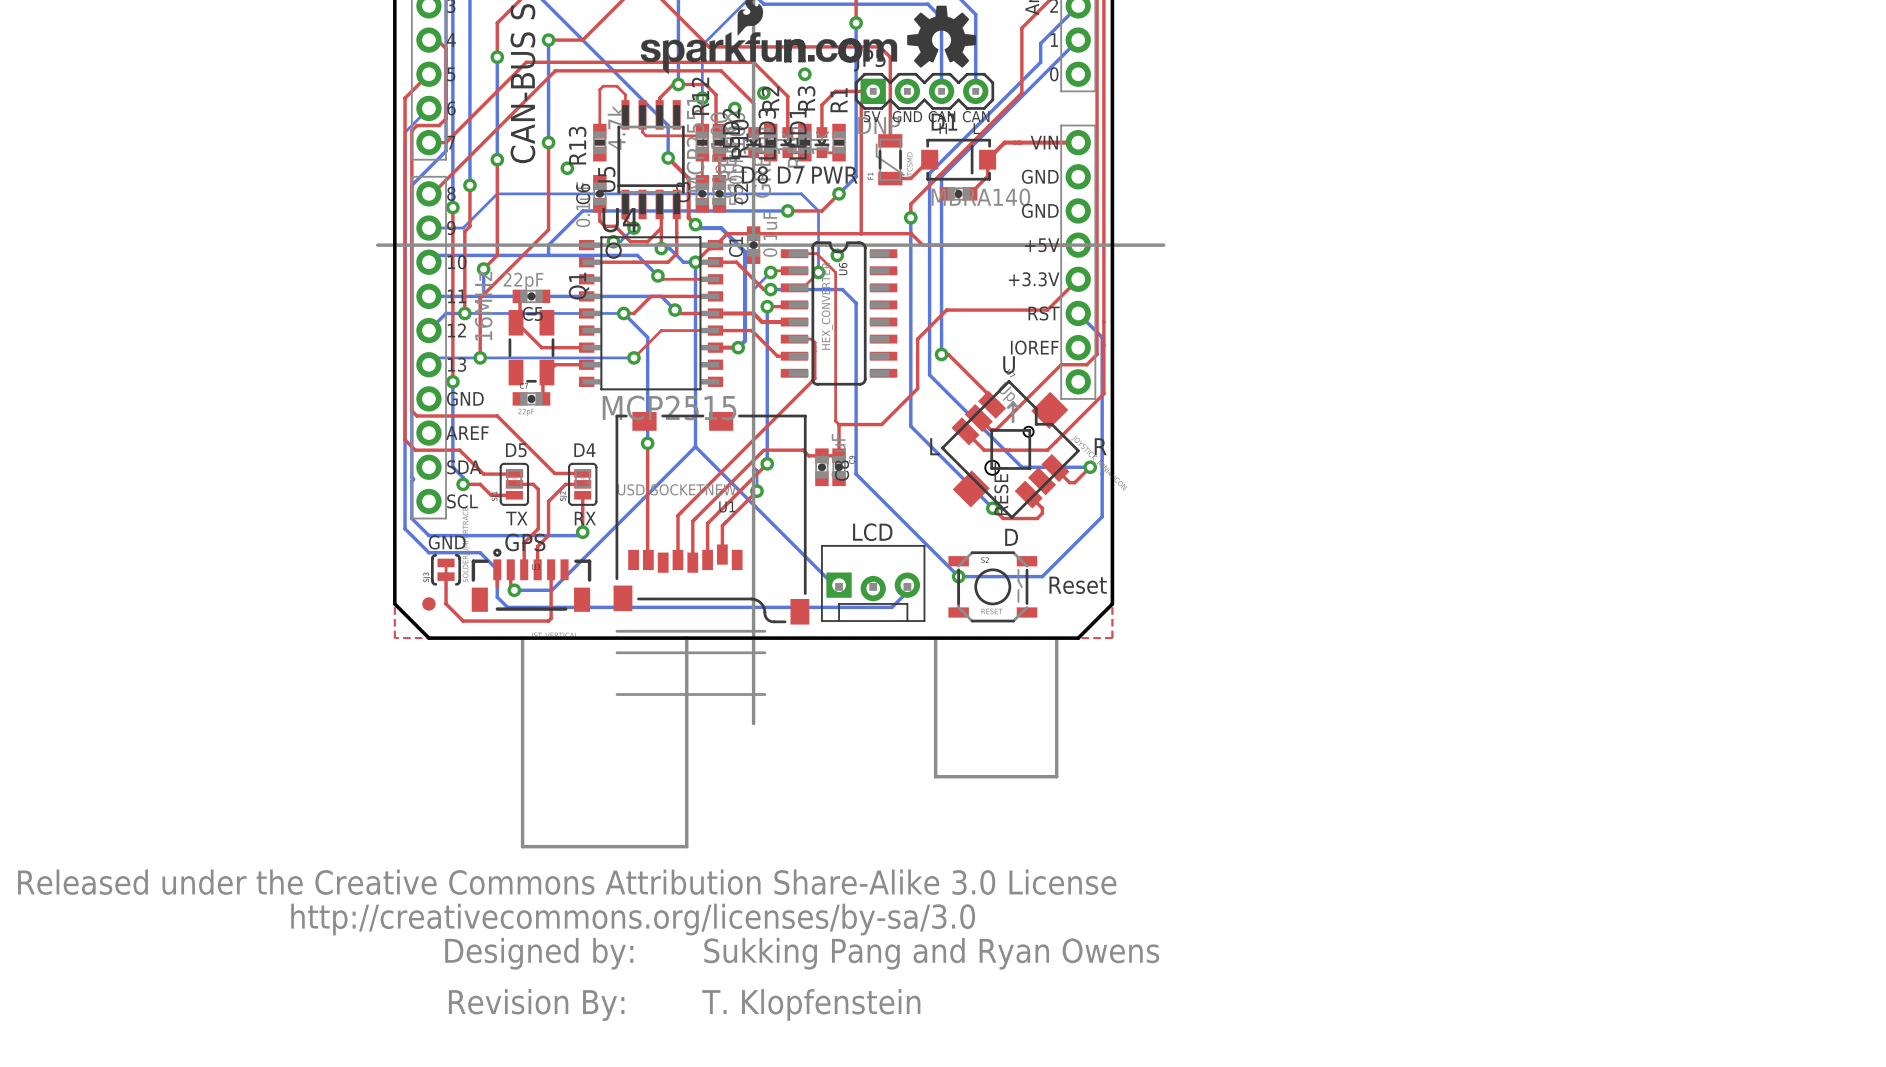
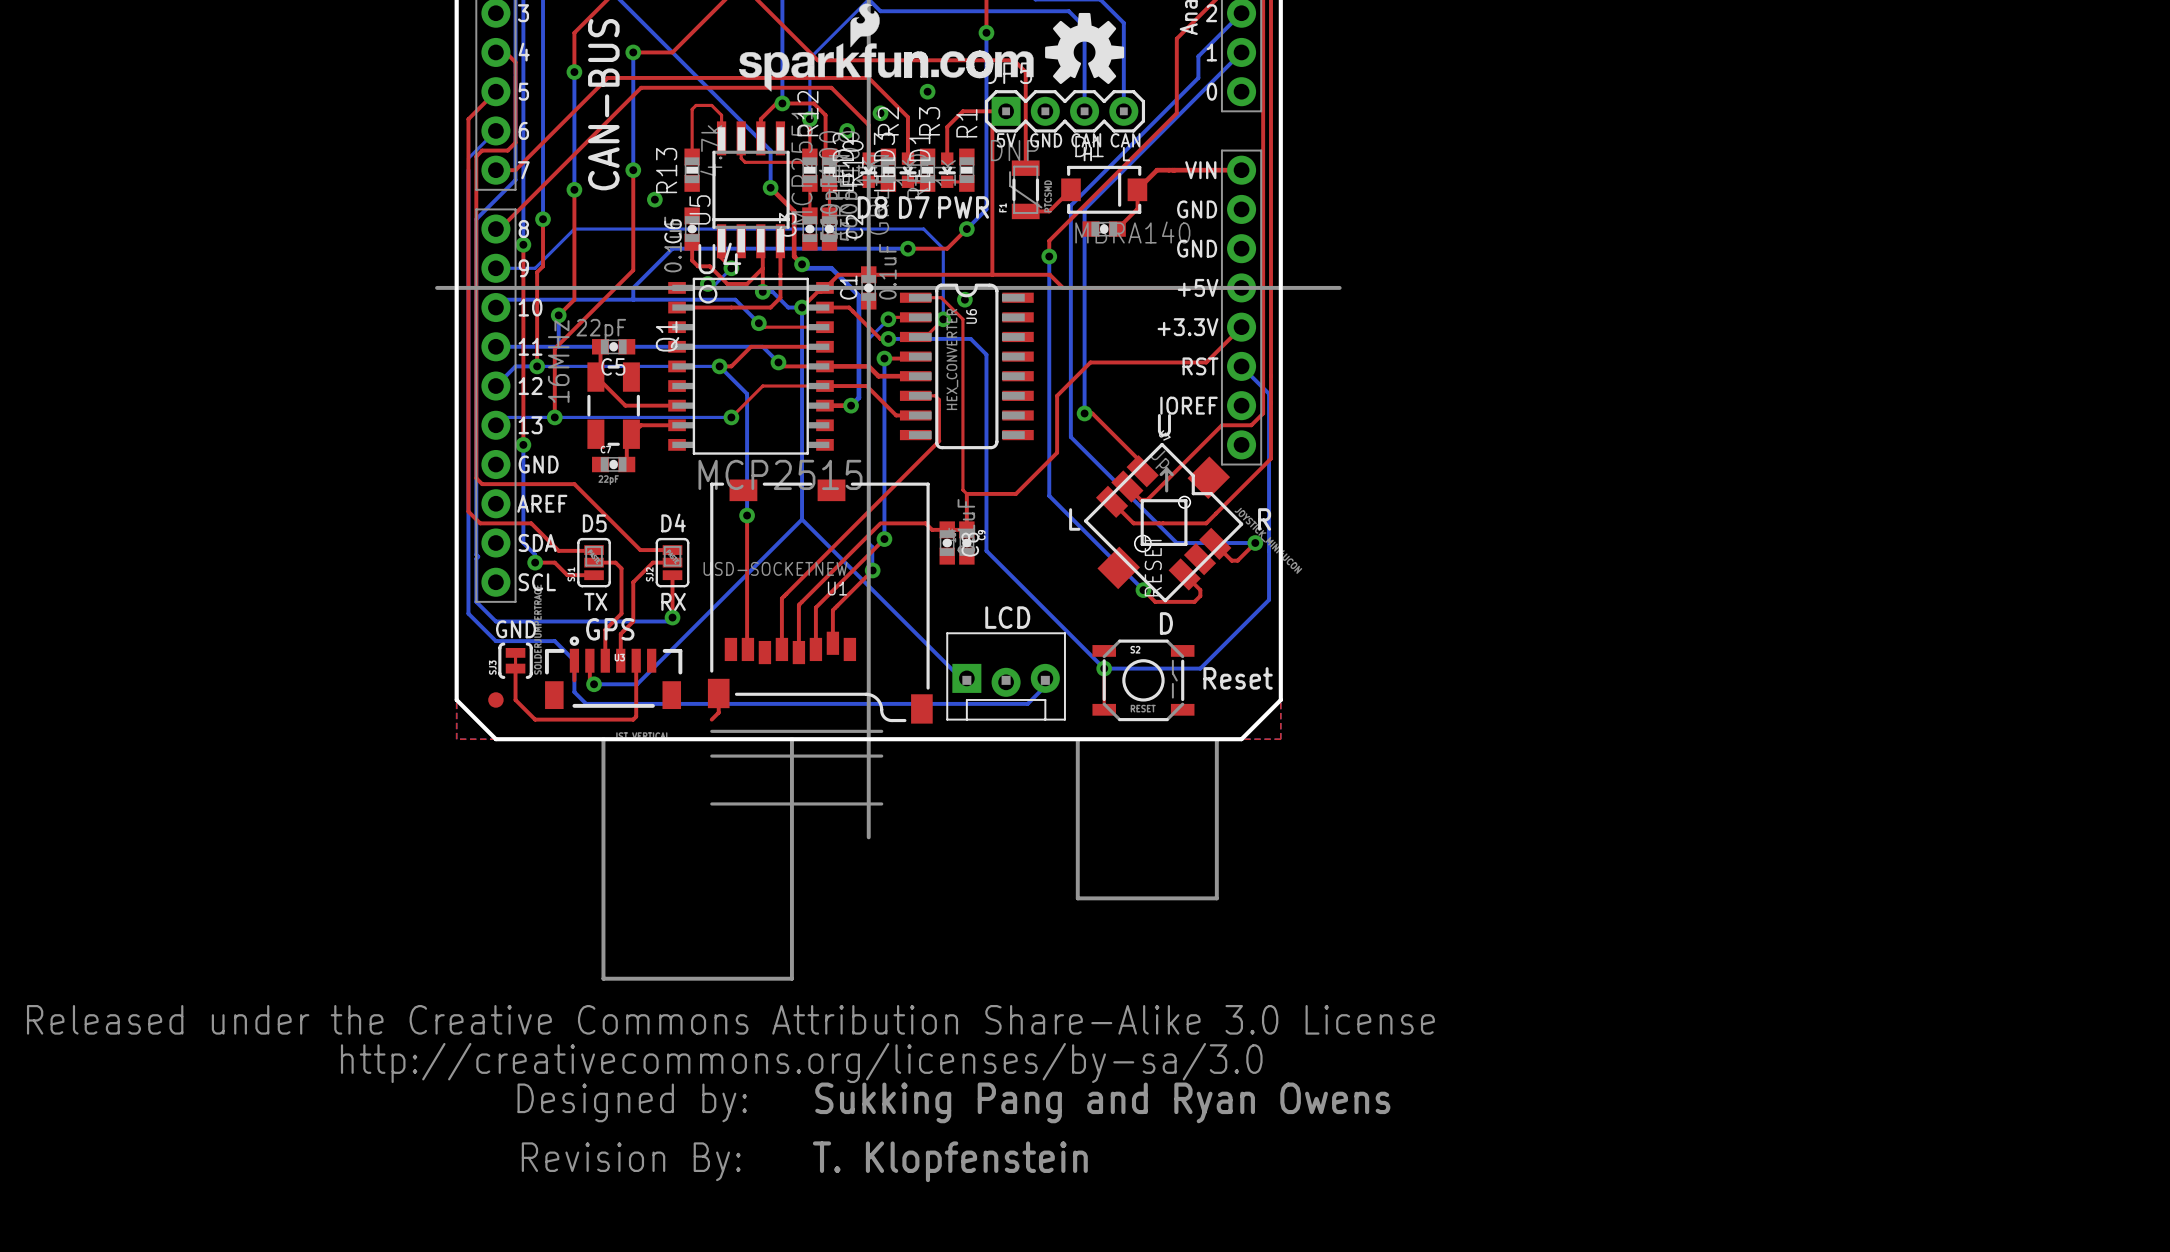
top track: none -> (718, 693) (718, 712) (711, 719)

